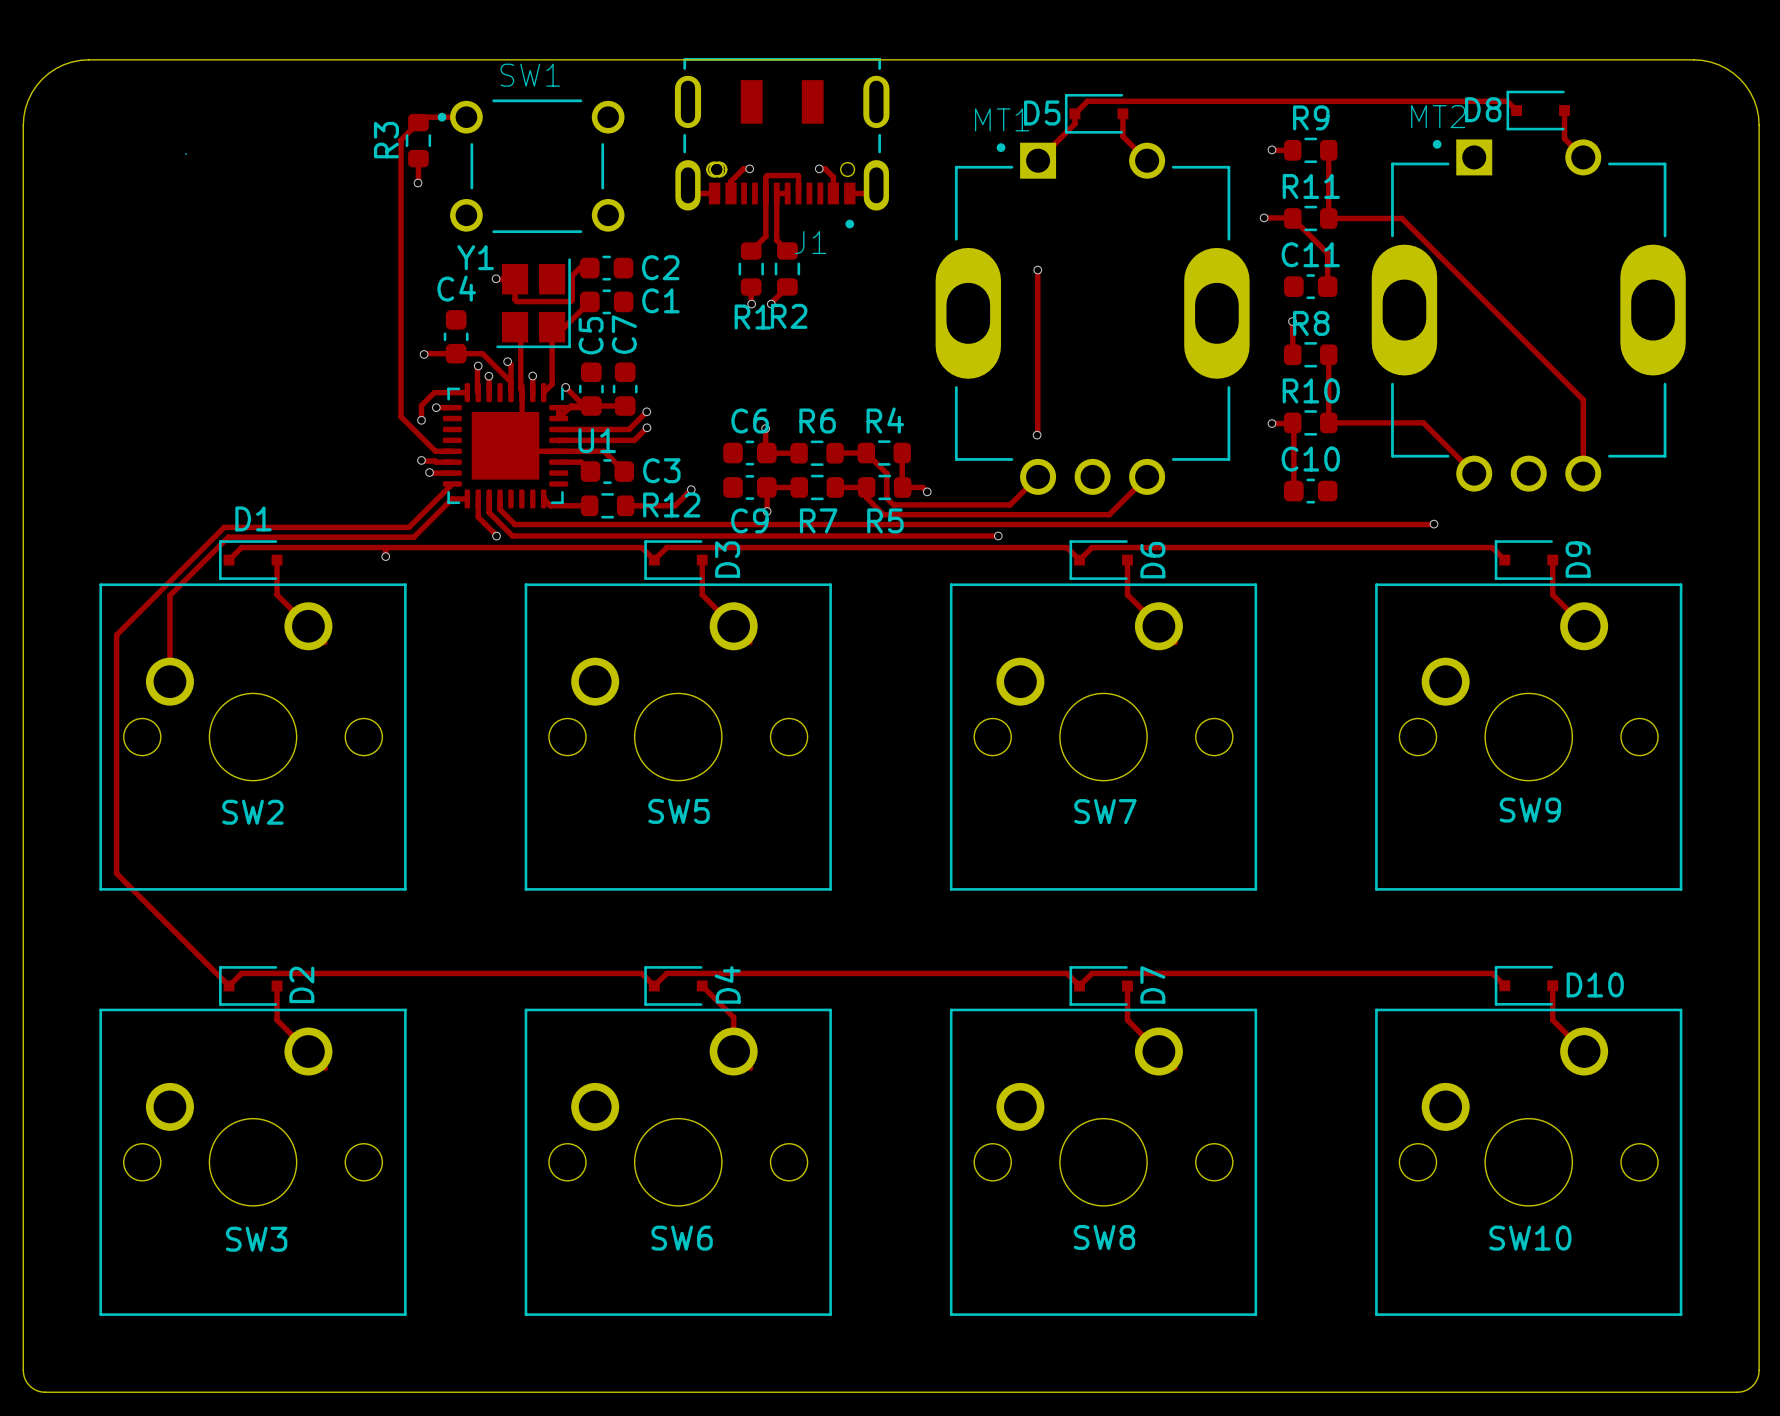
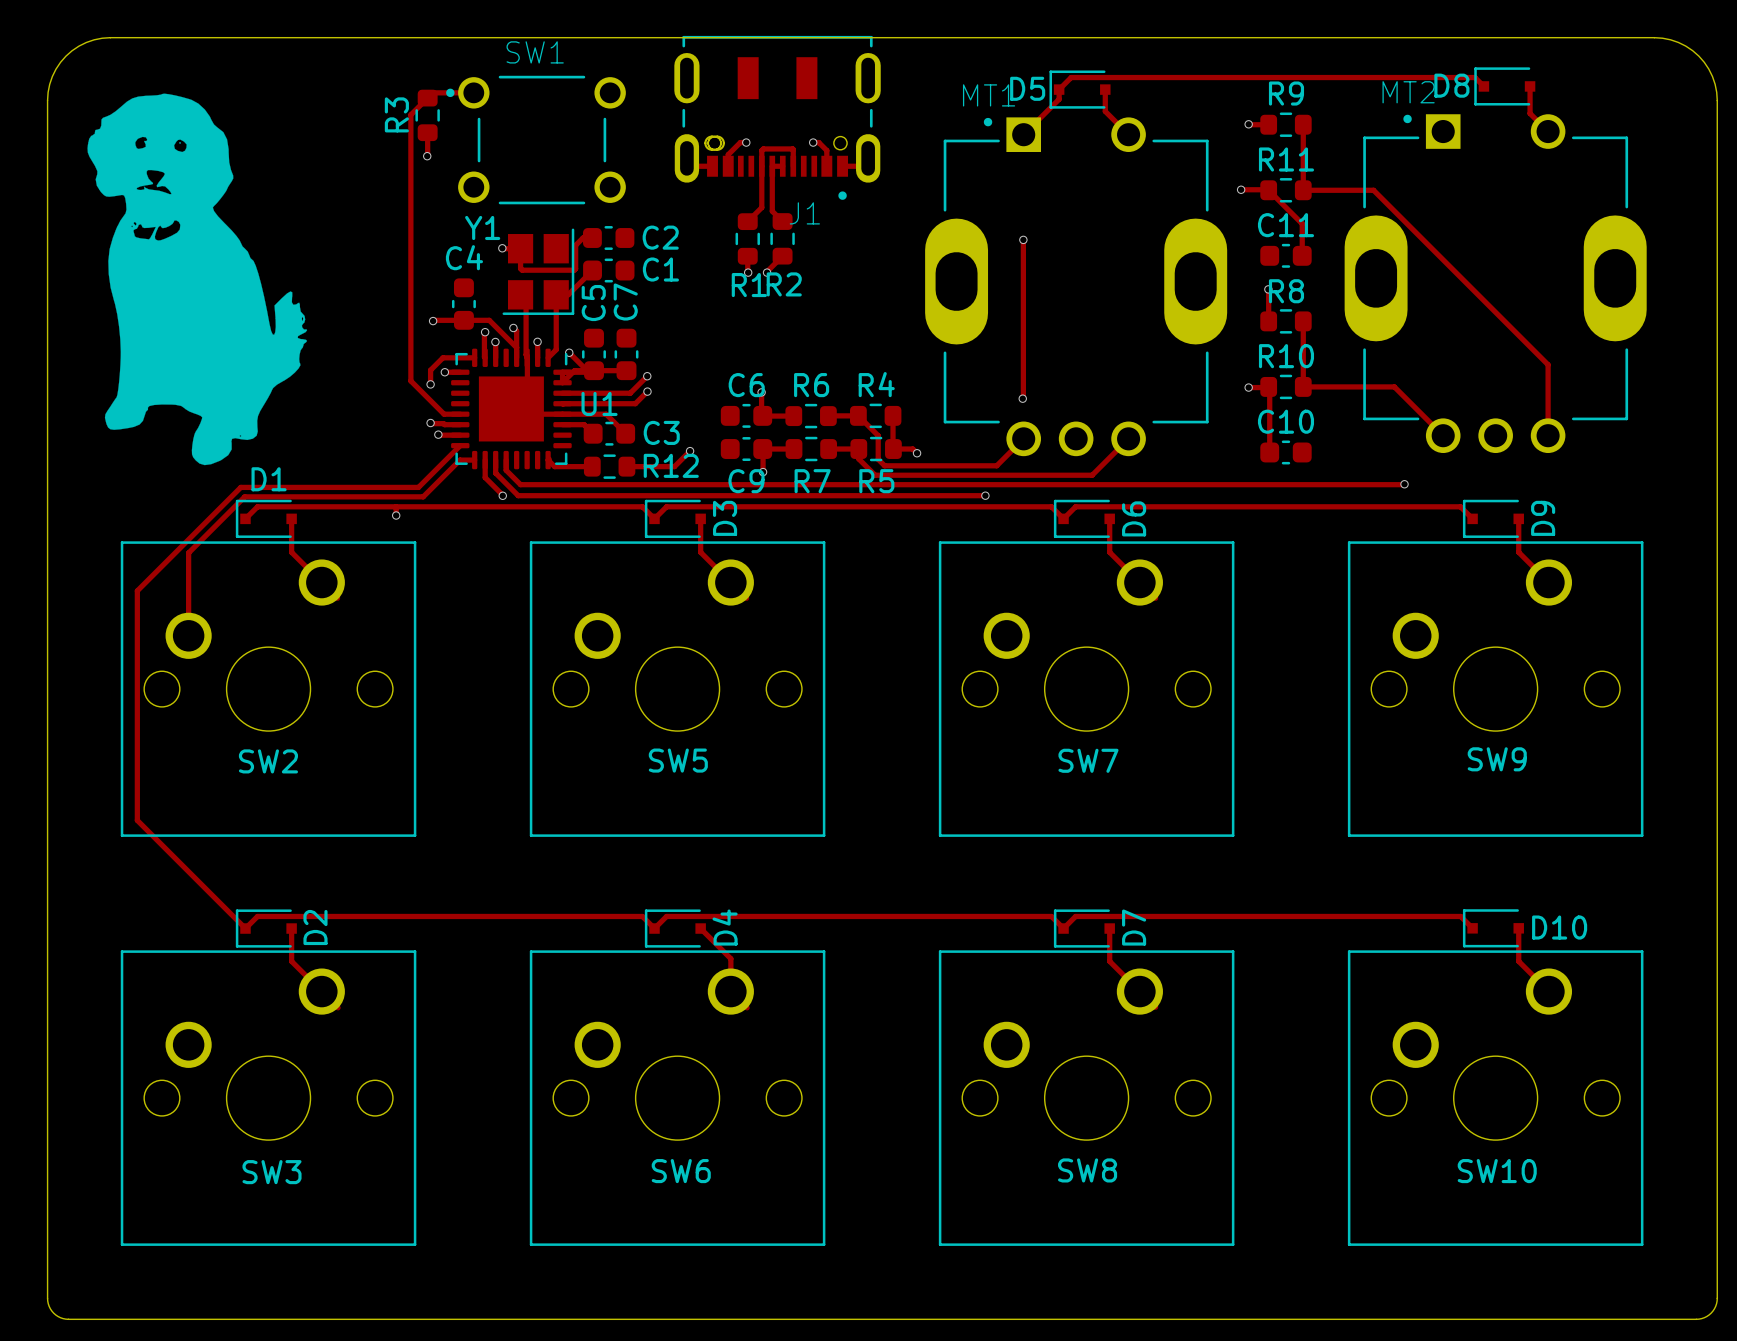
drawing: none -> [87, 93, 308, 466]
drawing: [185, 152, 188, 155] -> none

